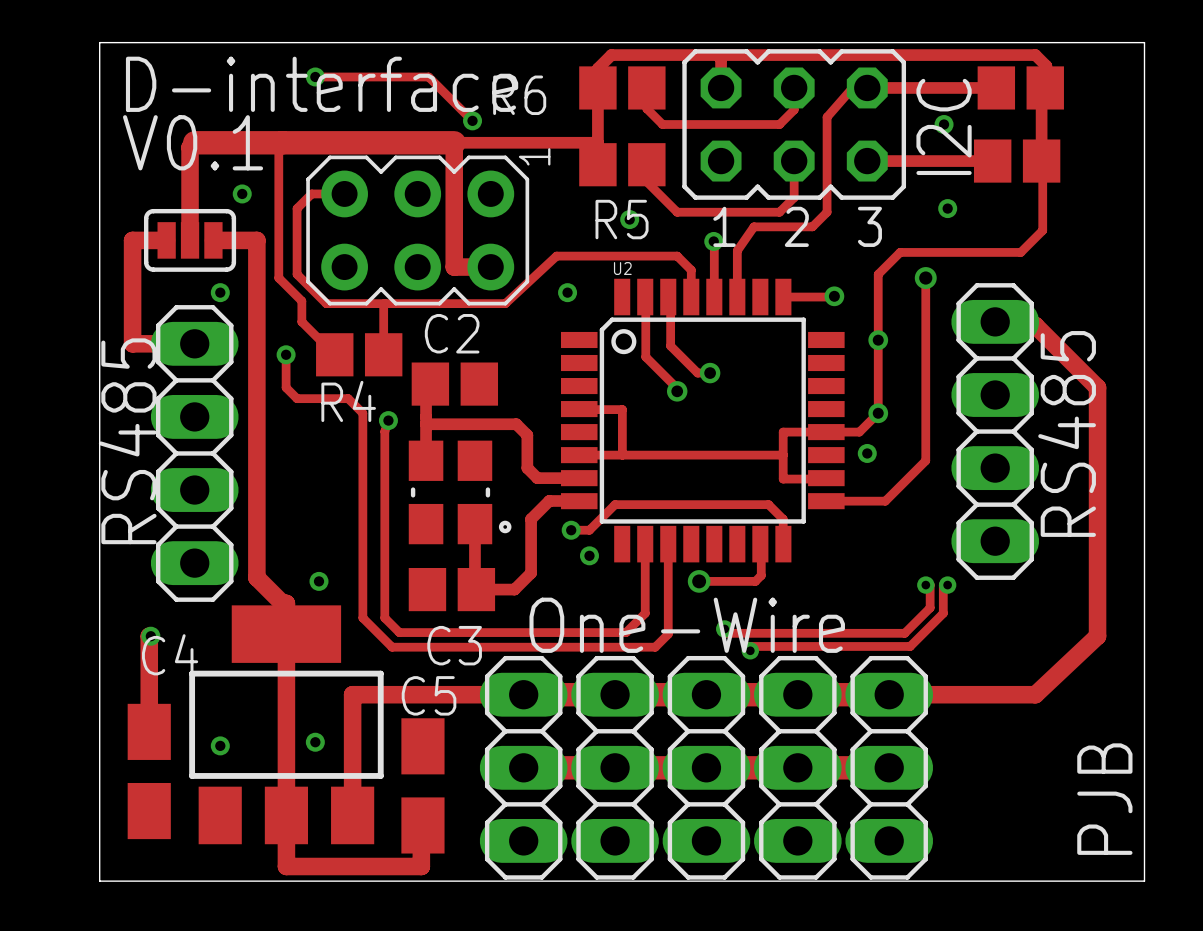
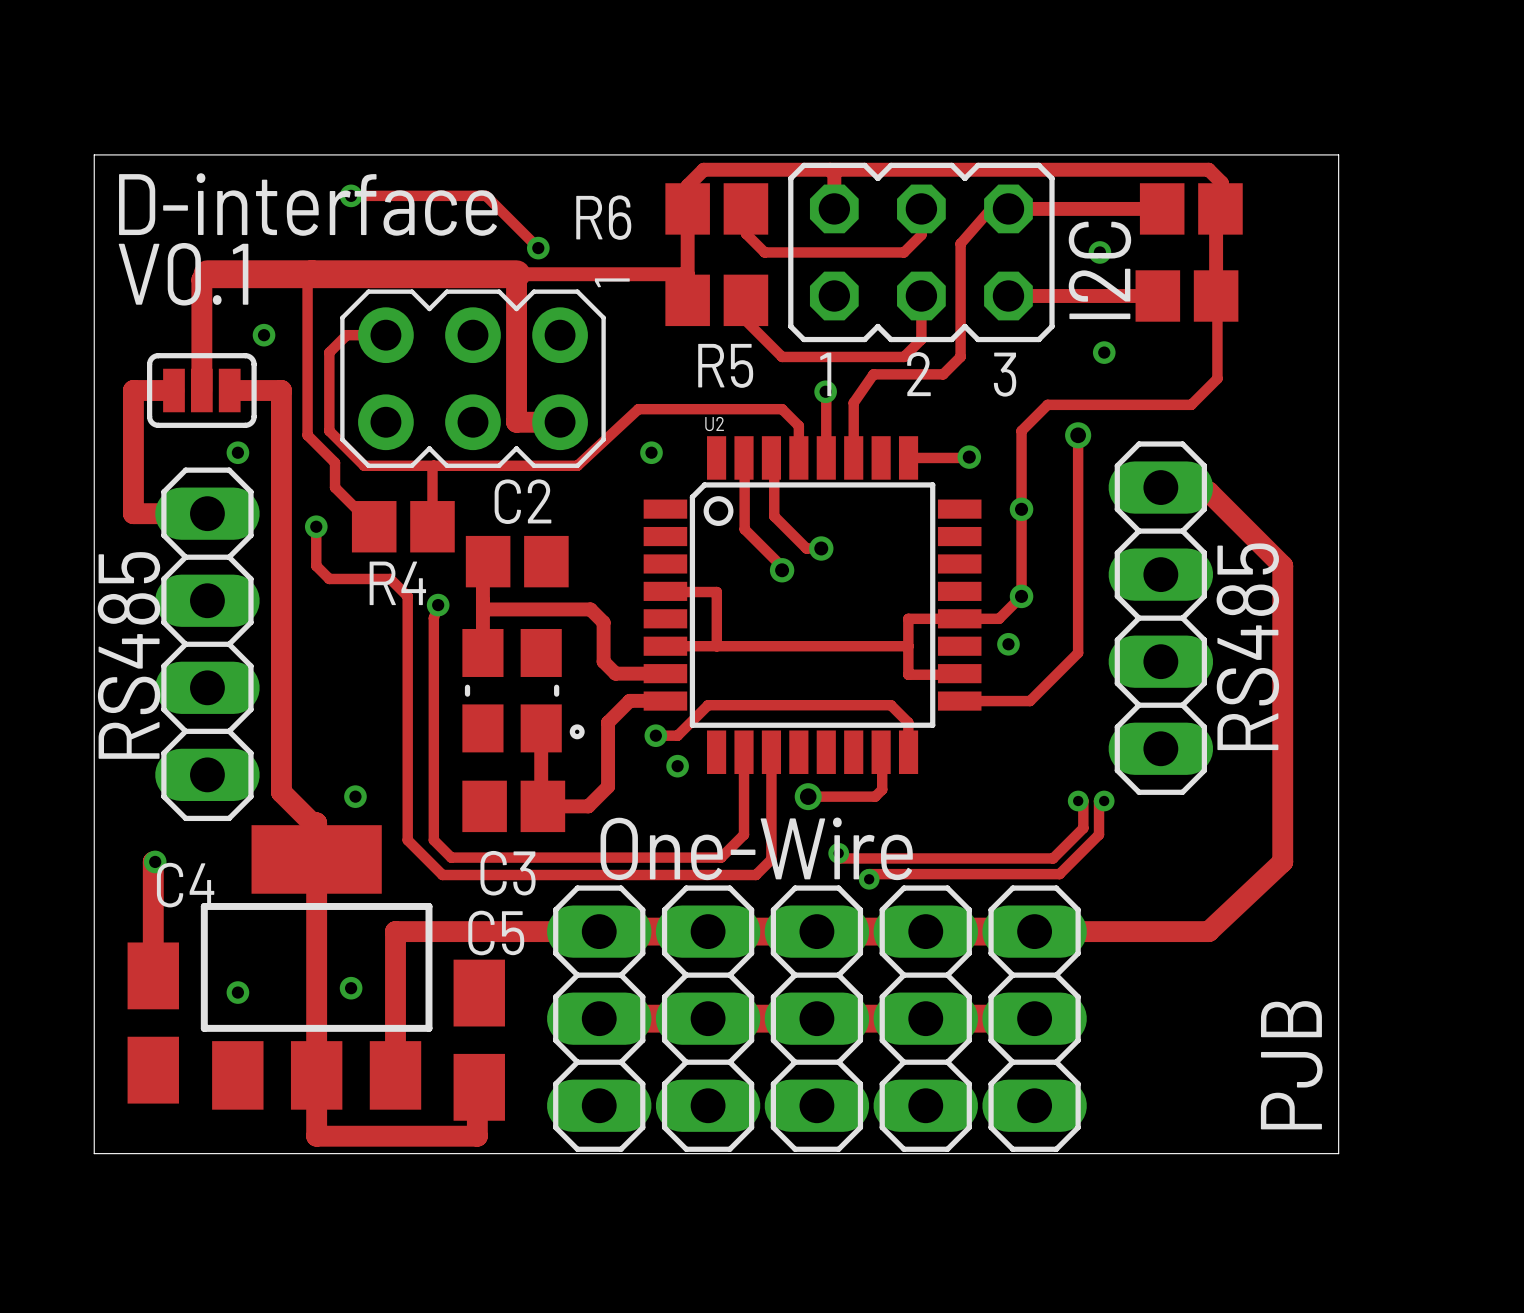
via: (629, 219) -> none

